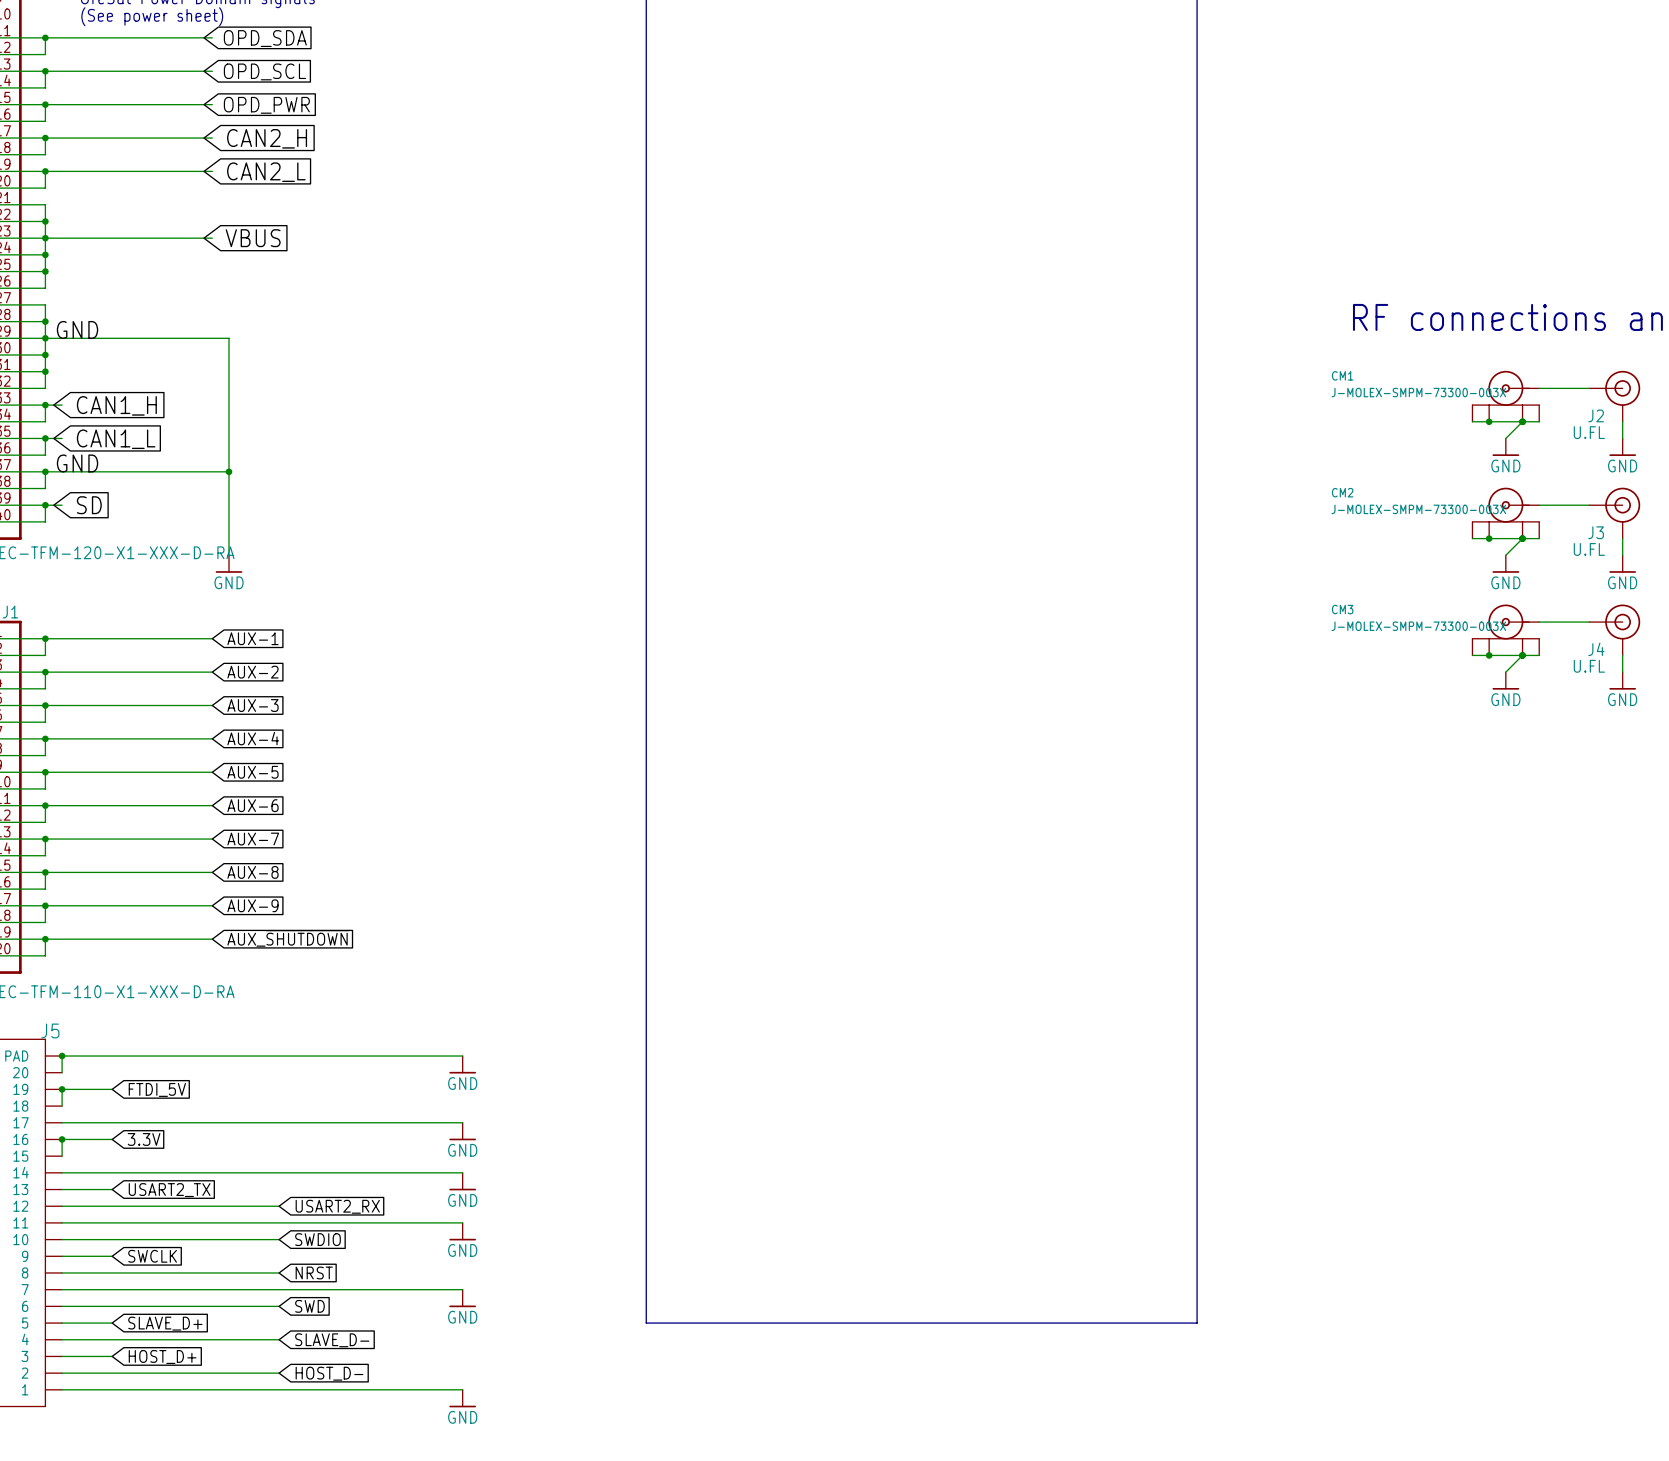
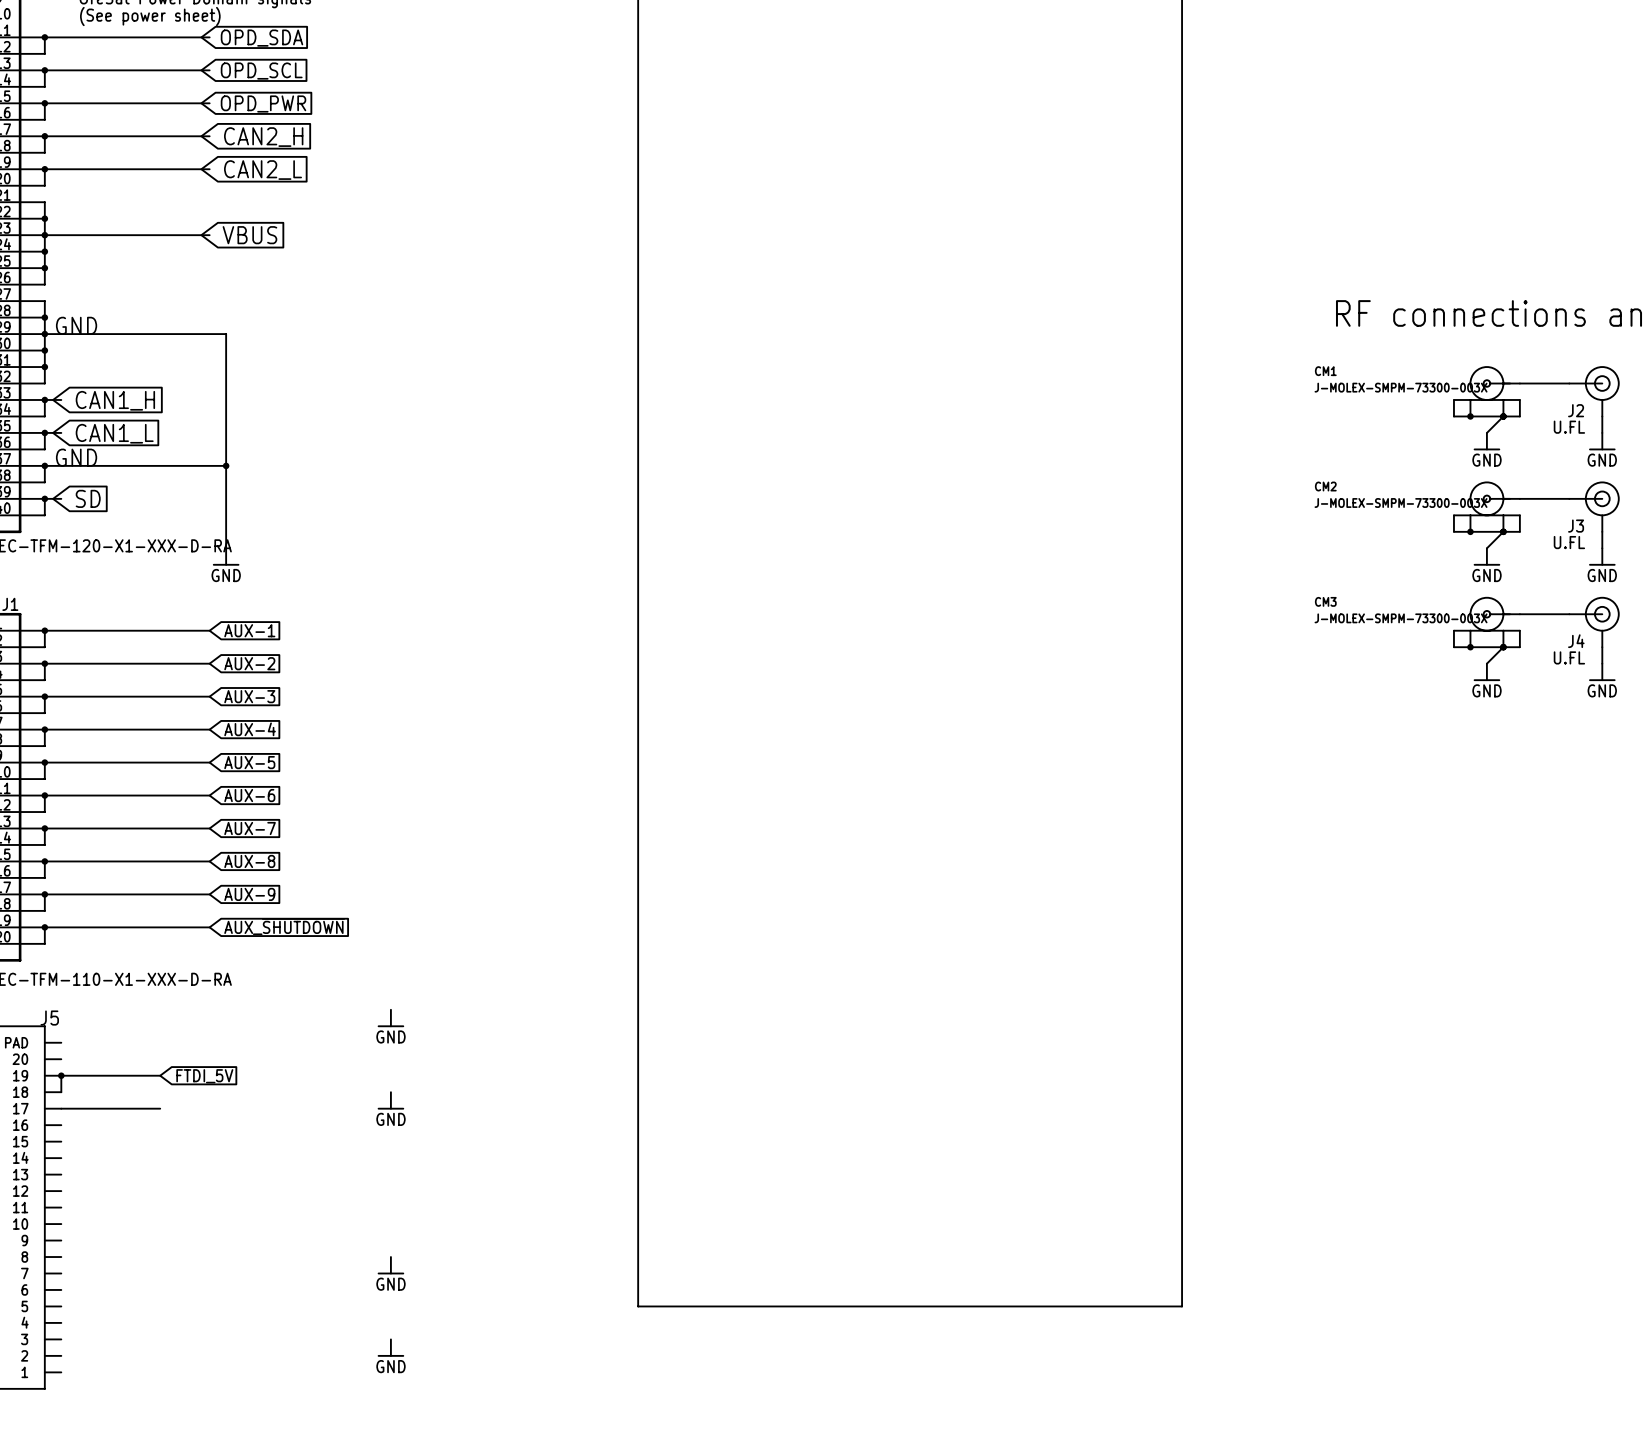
power symbol: none -> GND (390, 1018)
junction: (62, 1056) -> none
wire: (462, 1056) (62, 1056) (62, 1072) -> none
power symbol: GND (462, 1064) -> none
global label position: FTDI_5V (157, 1089) -> FTDI_5V (204, 1076)
power symbol: none -> GND (390, 1100)
wire: (162, 1122) (462, 1122) -> none
power symbol: GND (462, 1131) -> none
junction: (62, 1139) -> none
wire: (112, 1139) (62, 1139) (62, 1156) -> none
global label: 3.3V (144, 1139) -> none
wire: (62, 1172) (462, 1172) -> none
power symbol: GND (462, 1181) -> none
wire: (62, 1189) (112, 1189) -> (110, 1075) (160, 1075)
global label: USART2_TX (169, 1190) -> none
wire: (62, 1206) (279, 1206) -> none
global label: USART2_RX (337, 1206) -> none
wire: (62, 1222) (462, 1222) -> none
power symbol: GND (462, 1231) -> none
wire: (62, 1239) (279, 1239) -> none
global label: SWDIO (317, 1239) -> none
wire: (62, 1256) (112, 1256) -> none
global label: SWCLK (152, 1256) -> none
wire: (62, 1272) (279, 1272) -> none
global label: NRST (314, 1272) -> none
power symbol: none -> GND (390, 1265)
wire: (62, 1289) (462, 1289) -> none
power symbol: GND (462, 1298) -> none
wire: (62, 1306) (279, 1306) -> none
global label: SWD (309, 1306) -> none
wire: (62, 1323) (112, 1323) -> none
global label: SLAVE_D+ (165, 1323) -> none
wire: (62, 1339) (279, 1339) -> none
global label: SLAVE_D- (332, 1340) -> none
wire: (62, 1356) (112, 1356) -> none
global label: HOST_D+ (162, 1357) -> none
power symbol: none -> GND (390, 1348)
wire: (62, 1373) (279, 1373) -> none
global label: HOST_D- (329, 1373) -> none
wire: (62, 1389) (462, 1389) -> none
power symbol: GND (462, 1398) -> none

